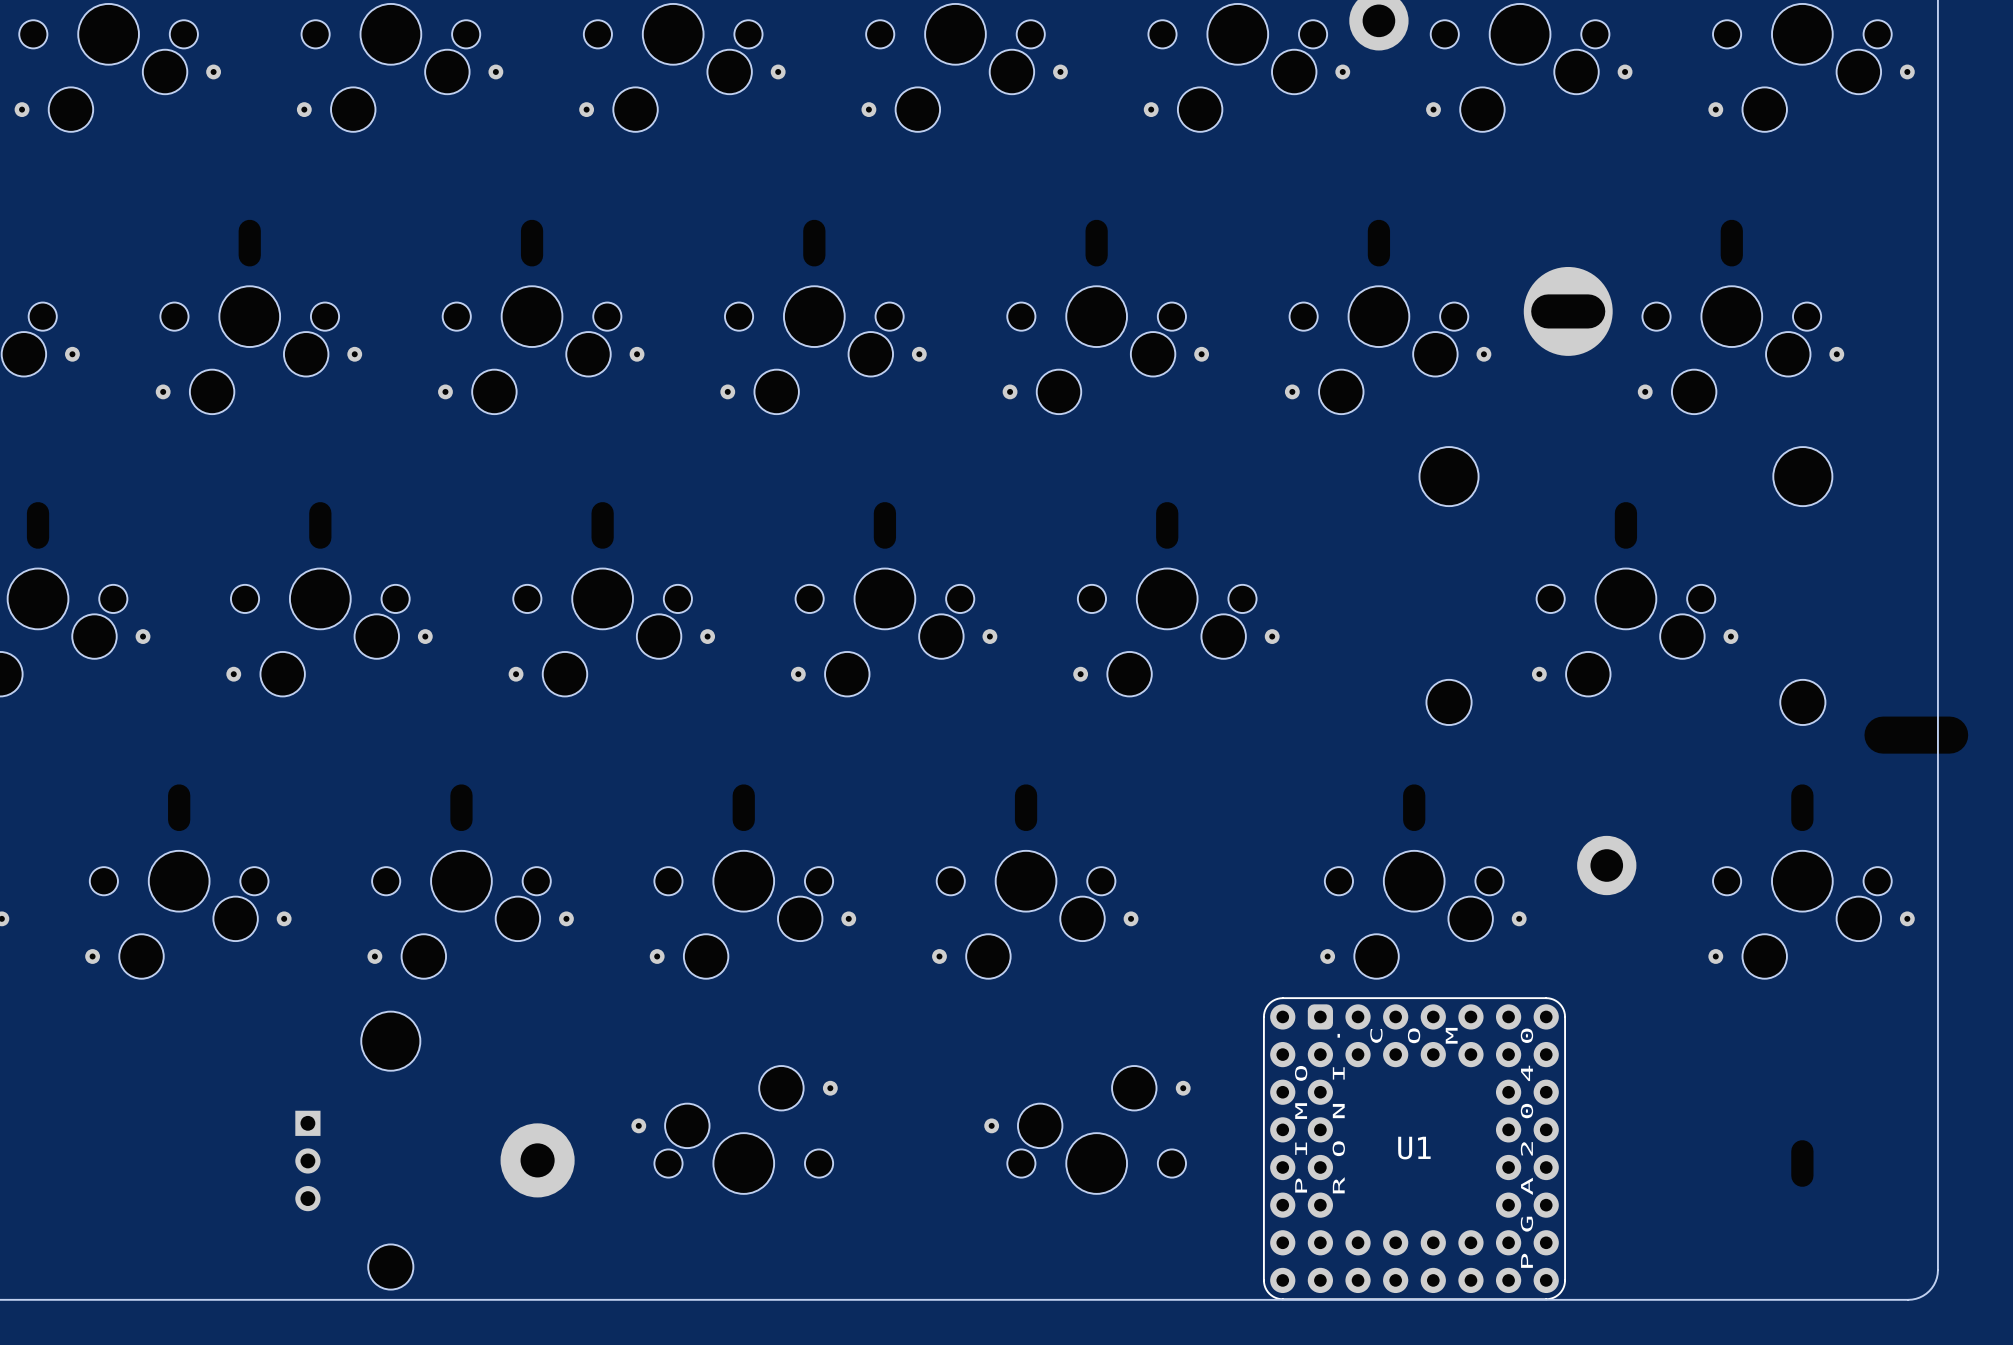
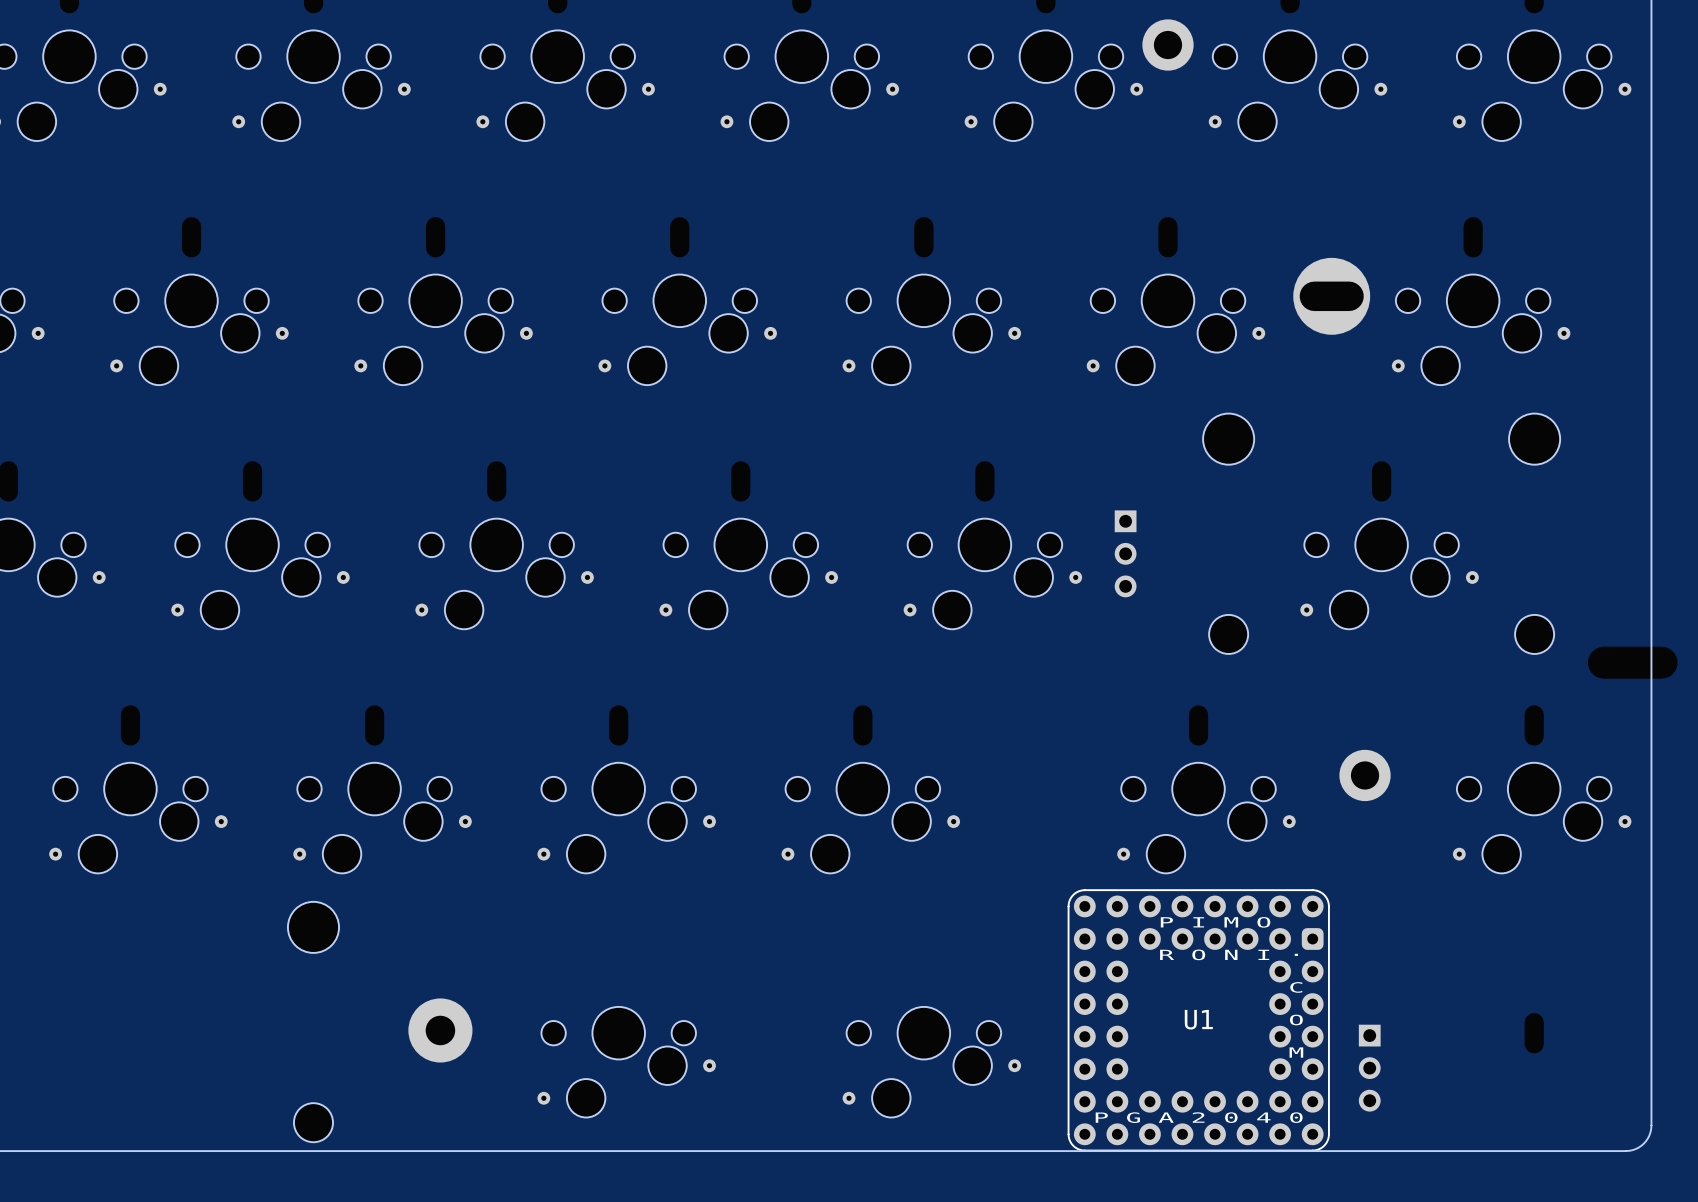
part: none -> (1125, 553)
part rotation: 0° (734, 1129) -> 180° (626, 1062)
part rotation: 0° (1087, 1129) -> 180° (931, 1062)
U1 rotation: 0° (1414, 1148) -> 90° clockwise (1198, 1020)
part: (307, 1160) -> none
part: none -> (1369, 1068)

